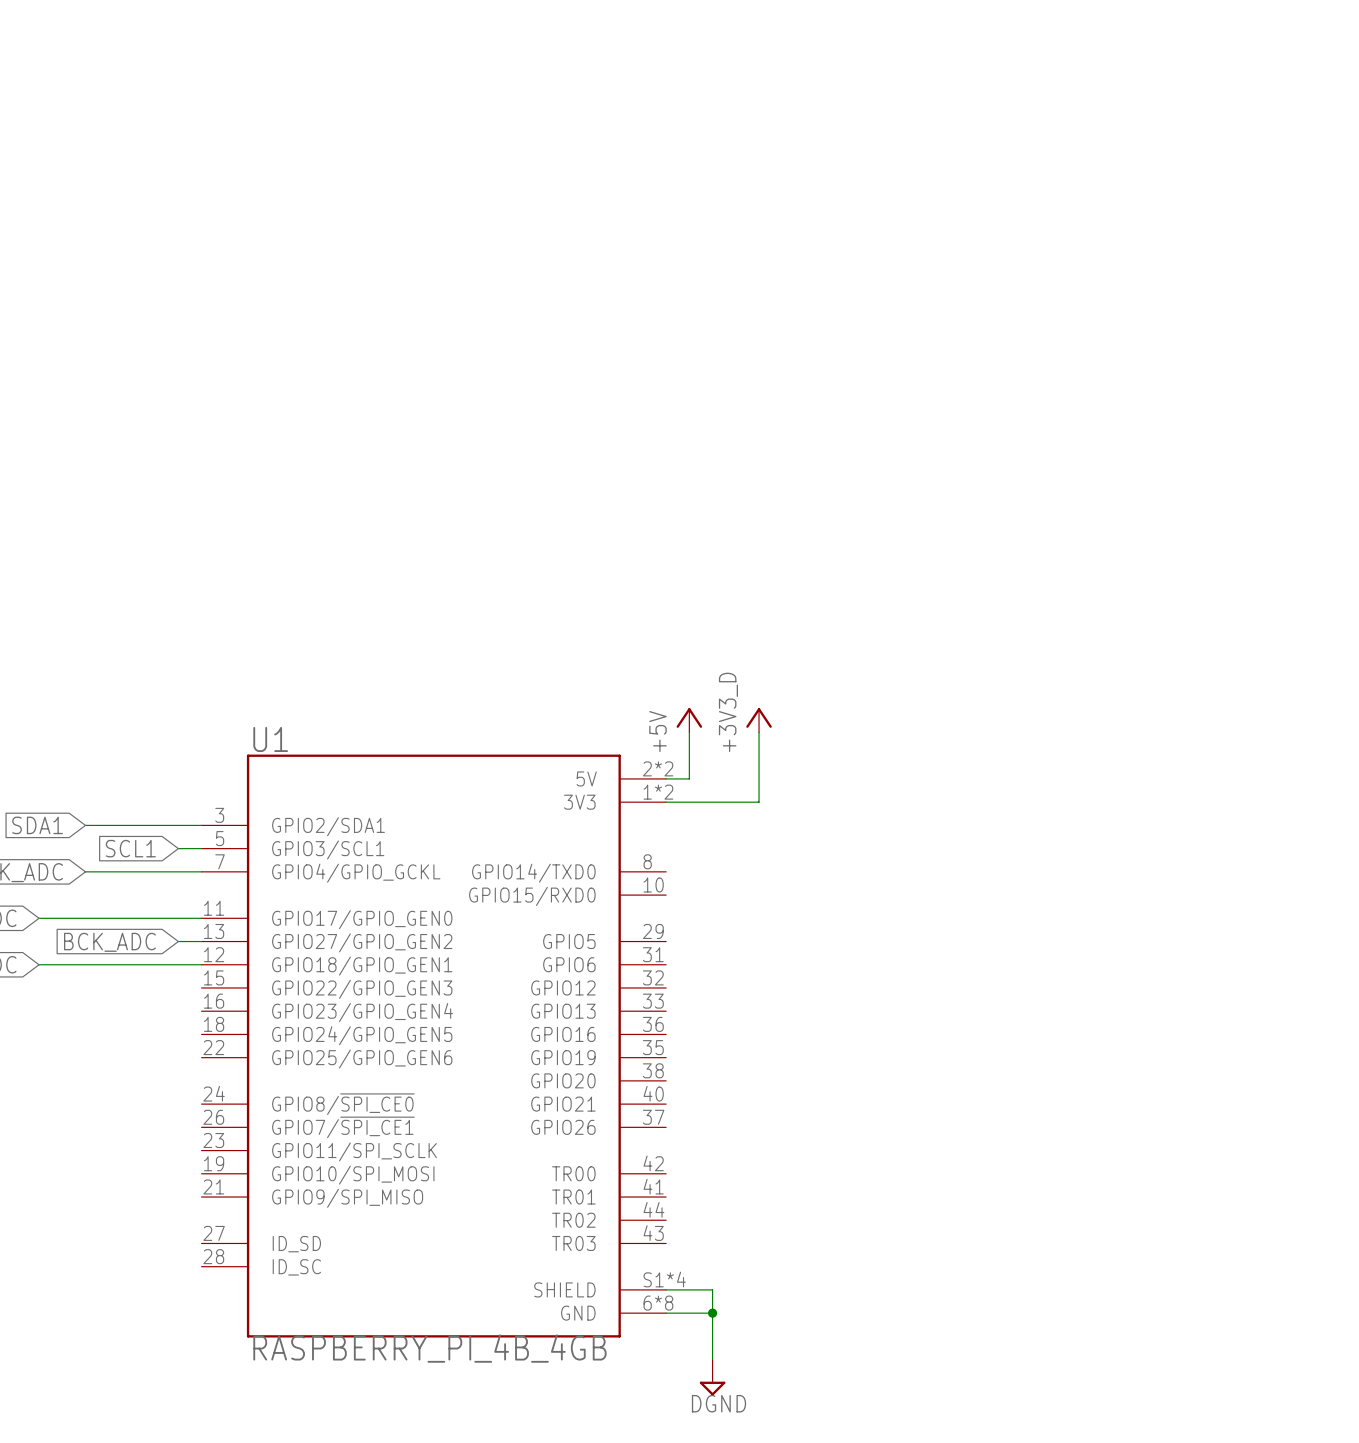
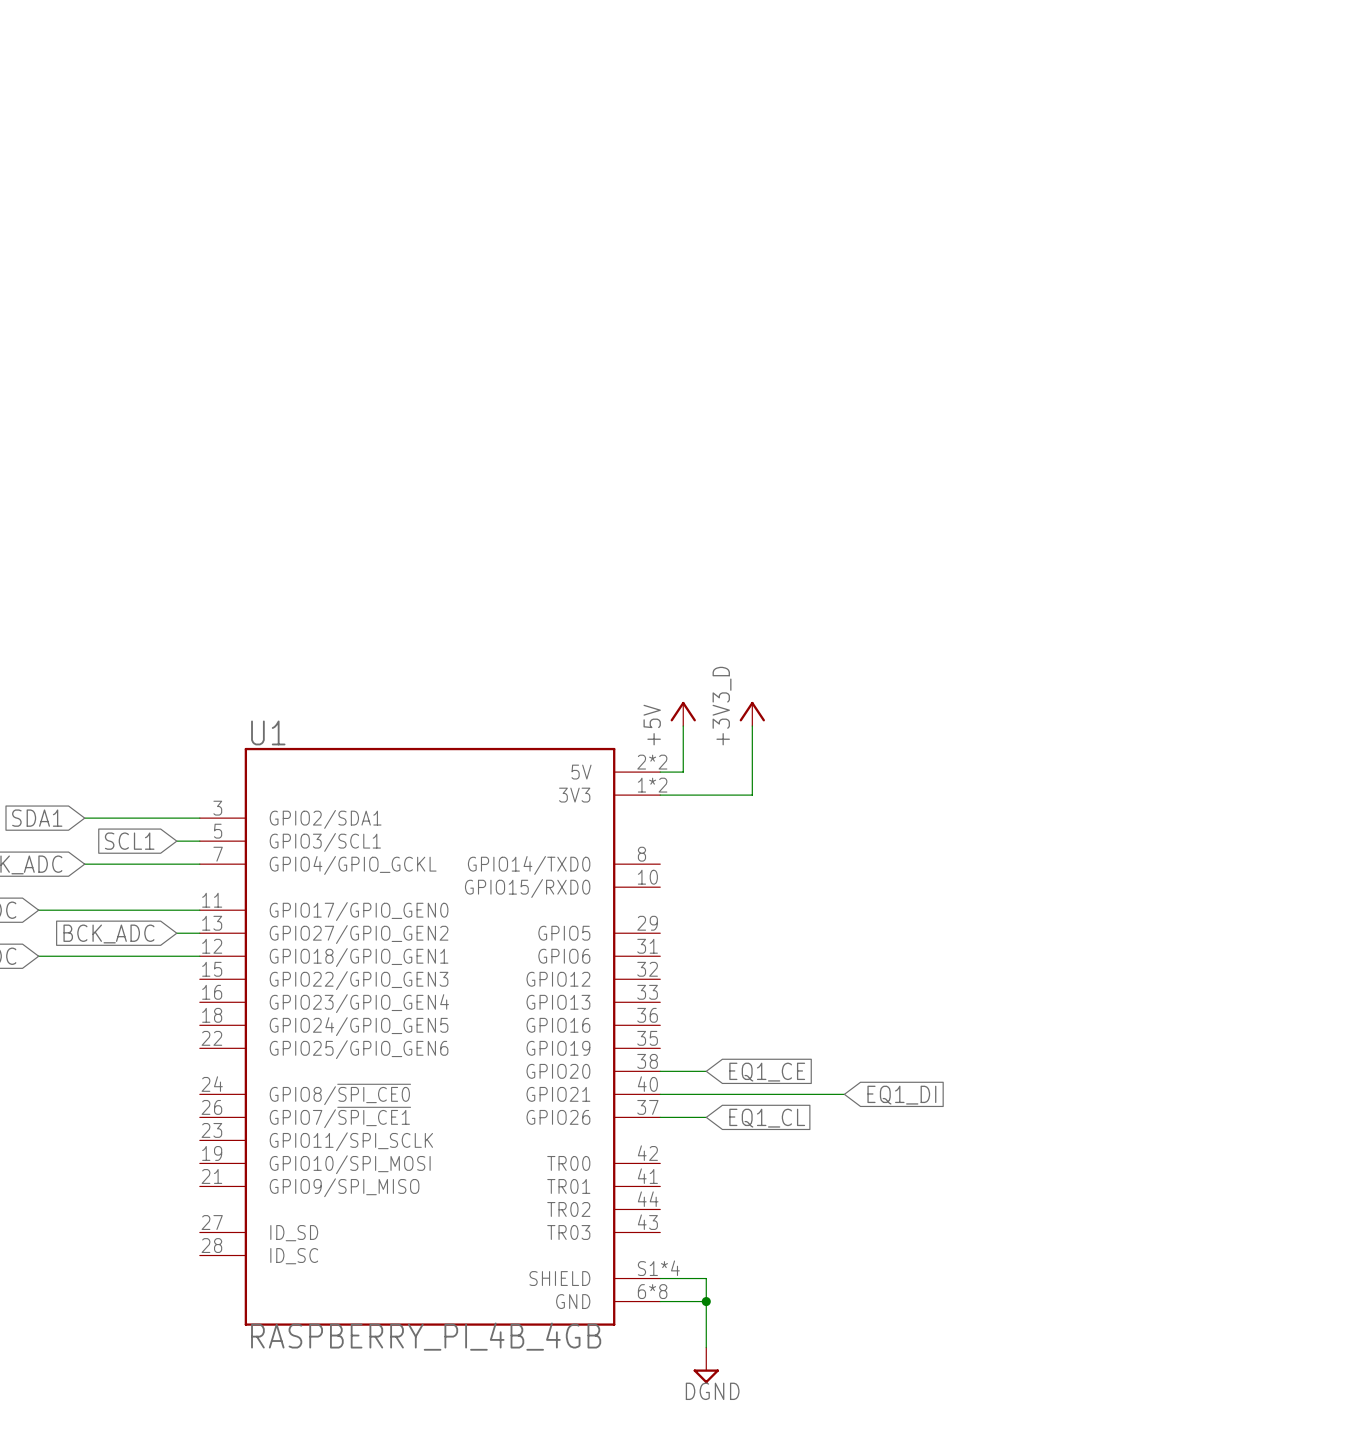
wire: none -> (660, 1071) (706, 1071)
global label: none -> EQ1_CE (767, 1072)
wire: none -> (660, 1094) (844, 1094)
global label: none -> EQ1_DI (901, 1095)
wire: none -> (660, 1117) (706, 1117)
global label: none -> EQ1_CL (767, 1118)

